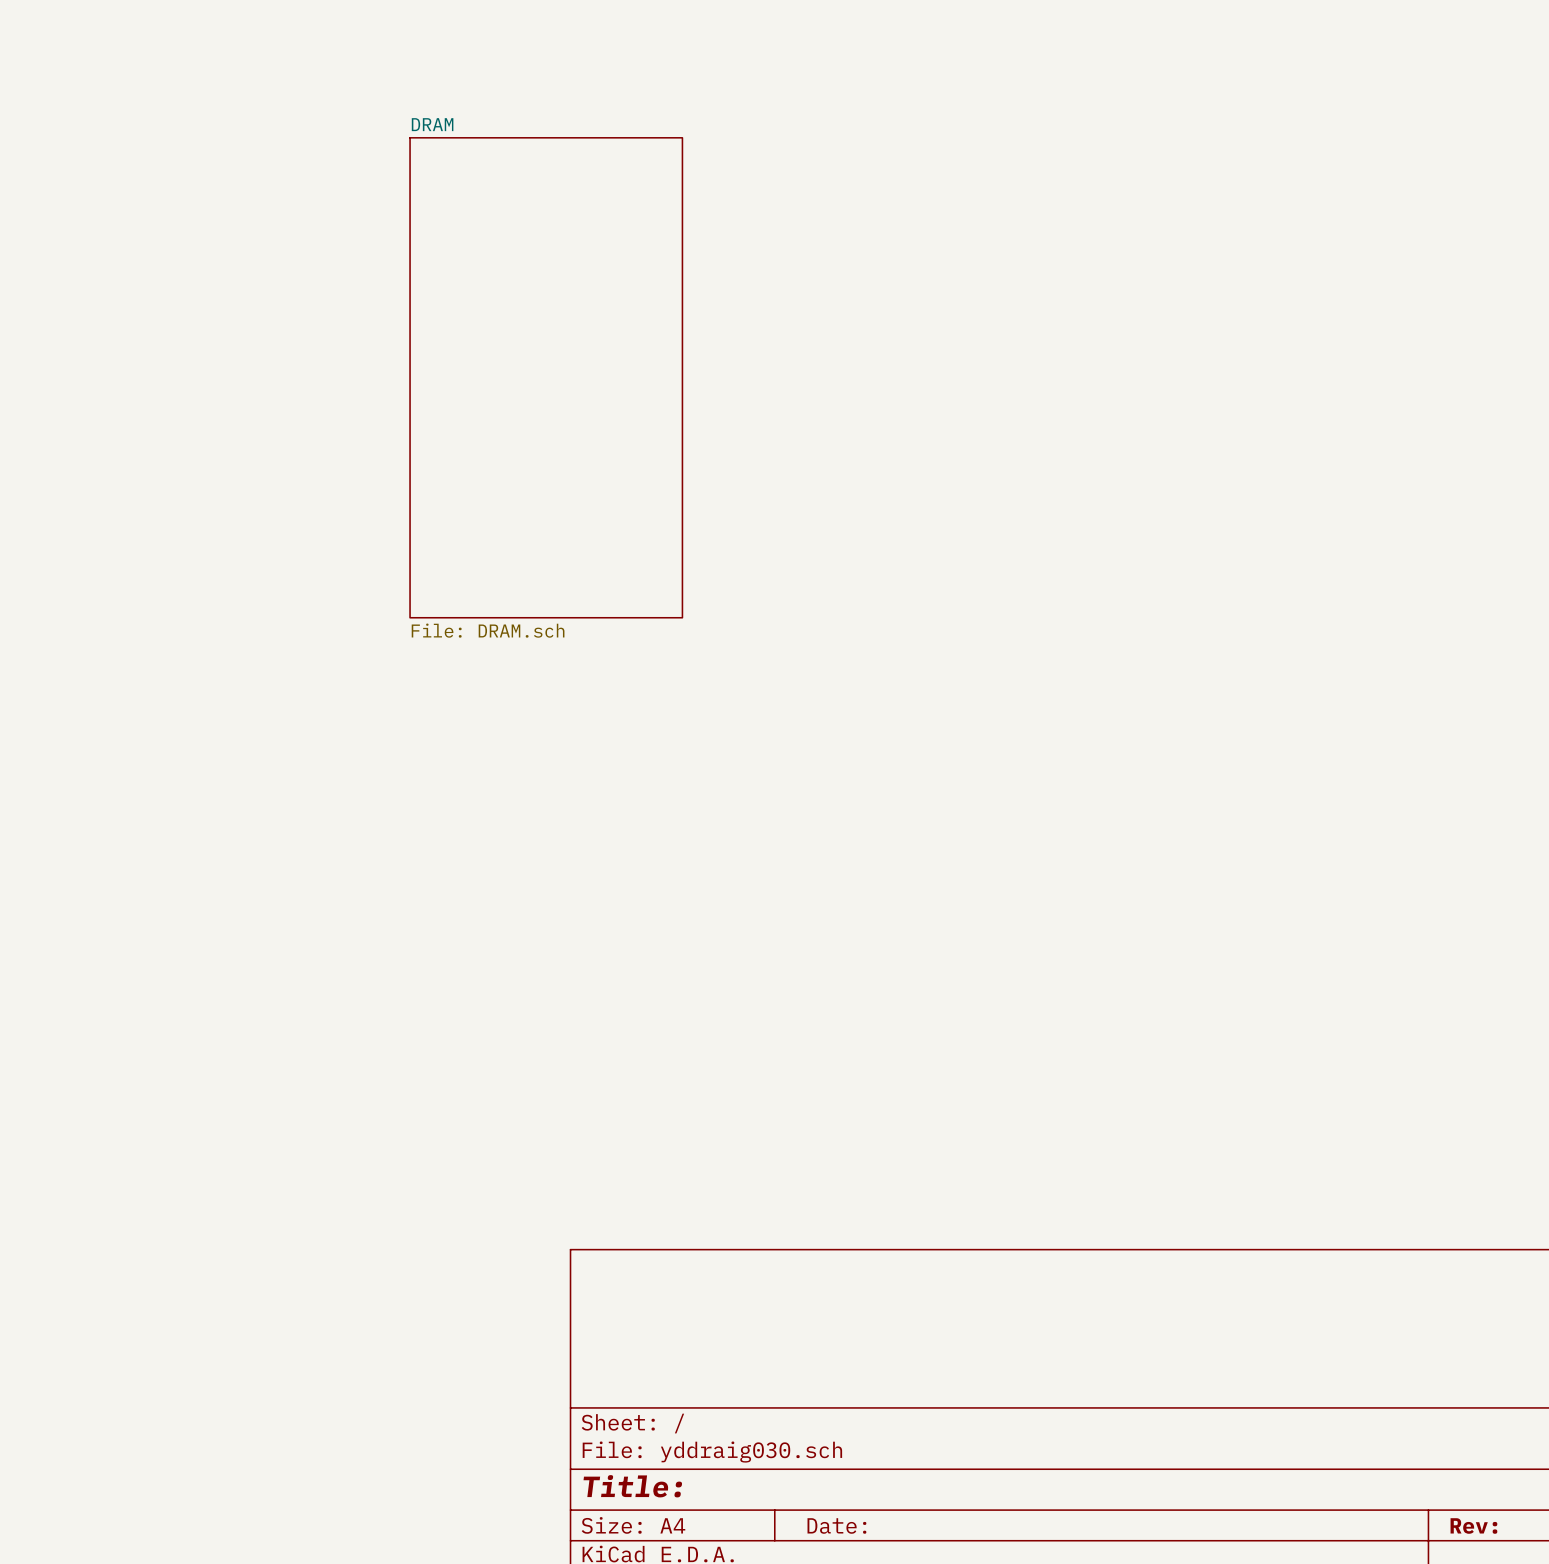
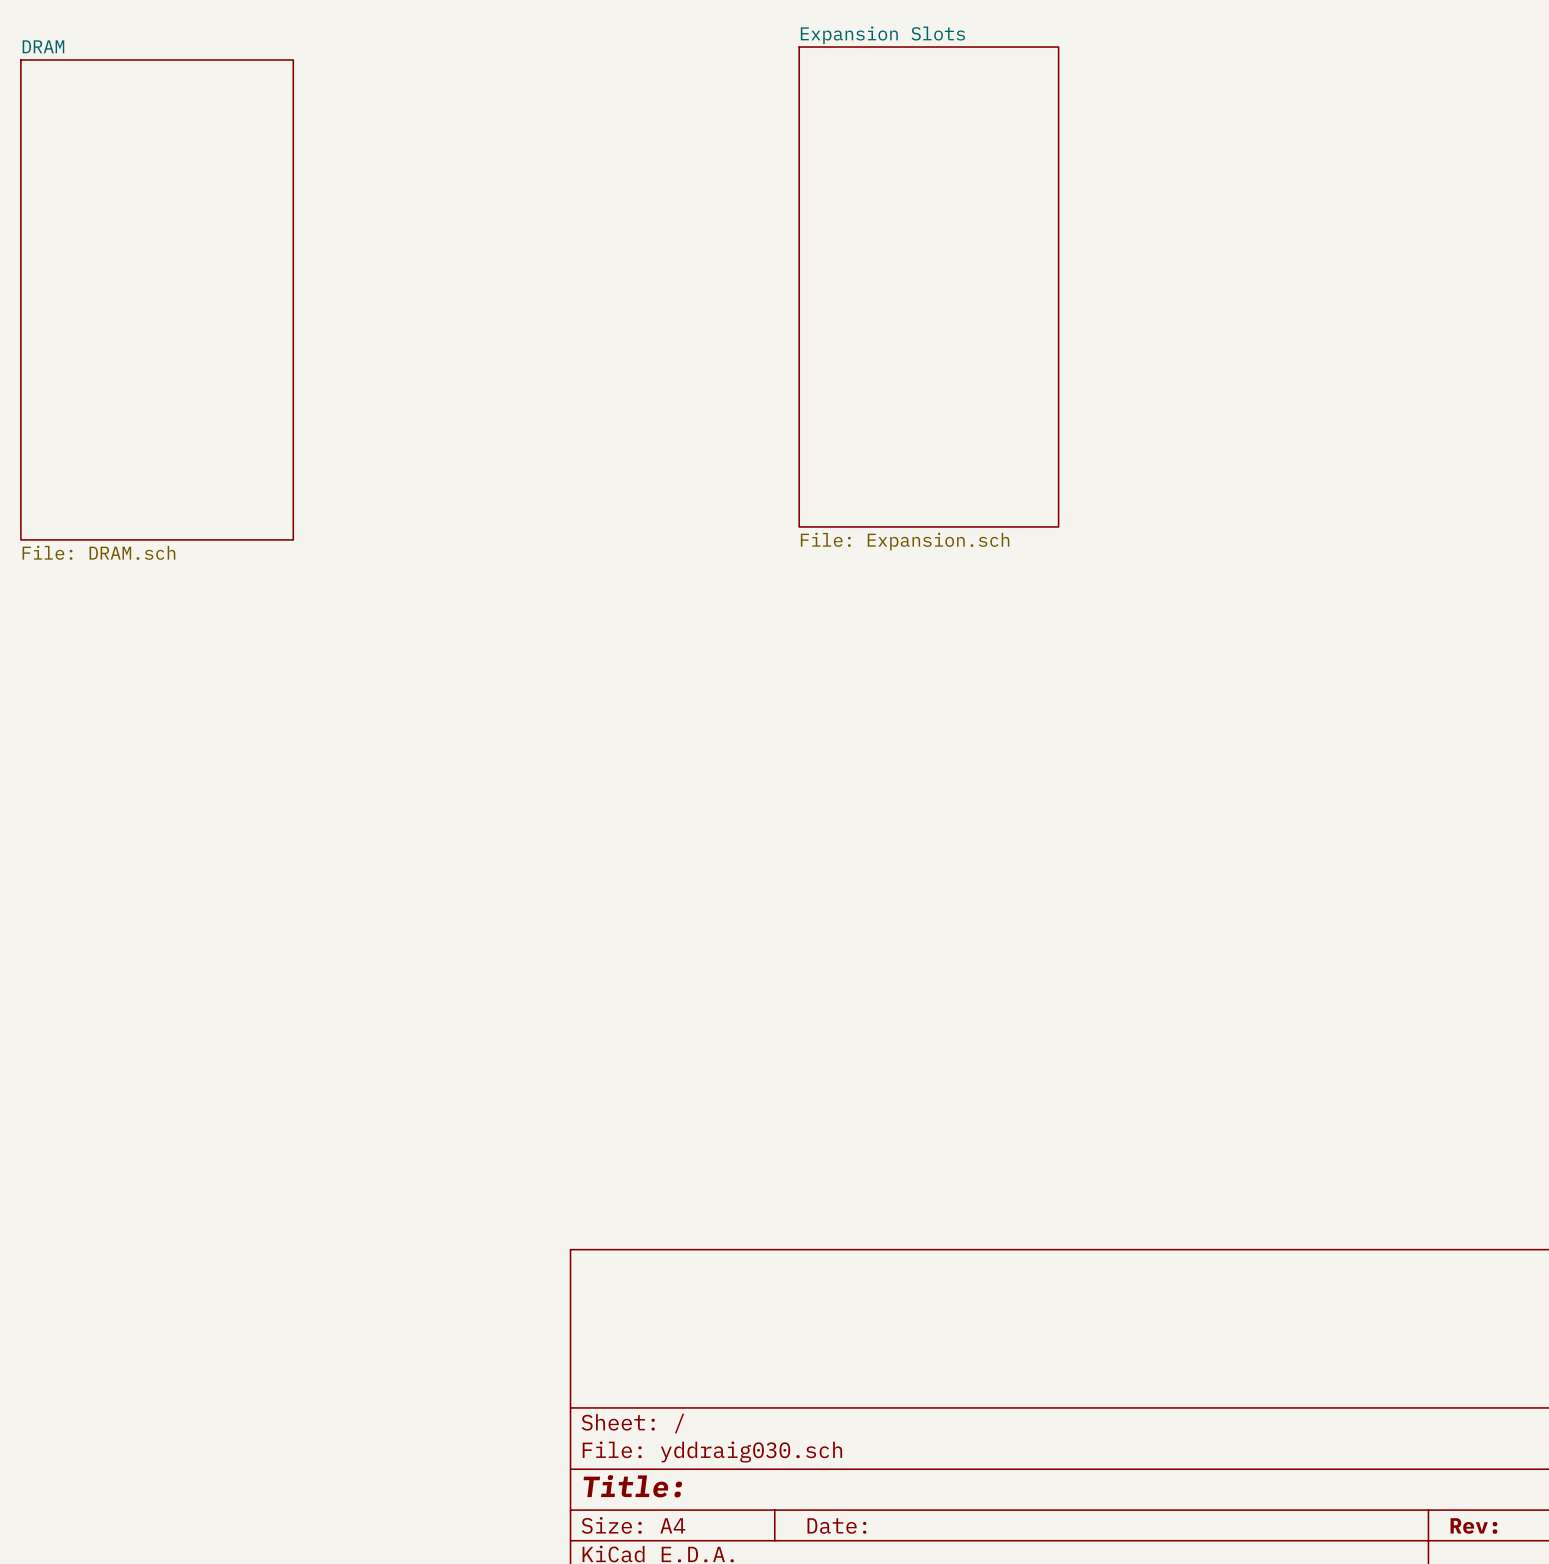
sheet Expansion Slots: none -> File: Expansion.sch (928, 286)
sheet DRAM: none -> File: DRAM.sch (157, 299)
sheet DRAM: File: DRAM.sch (546, 377) -> none

